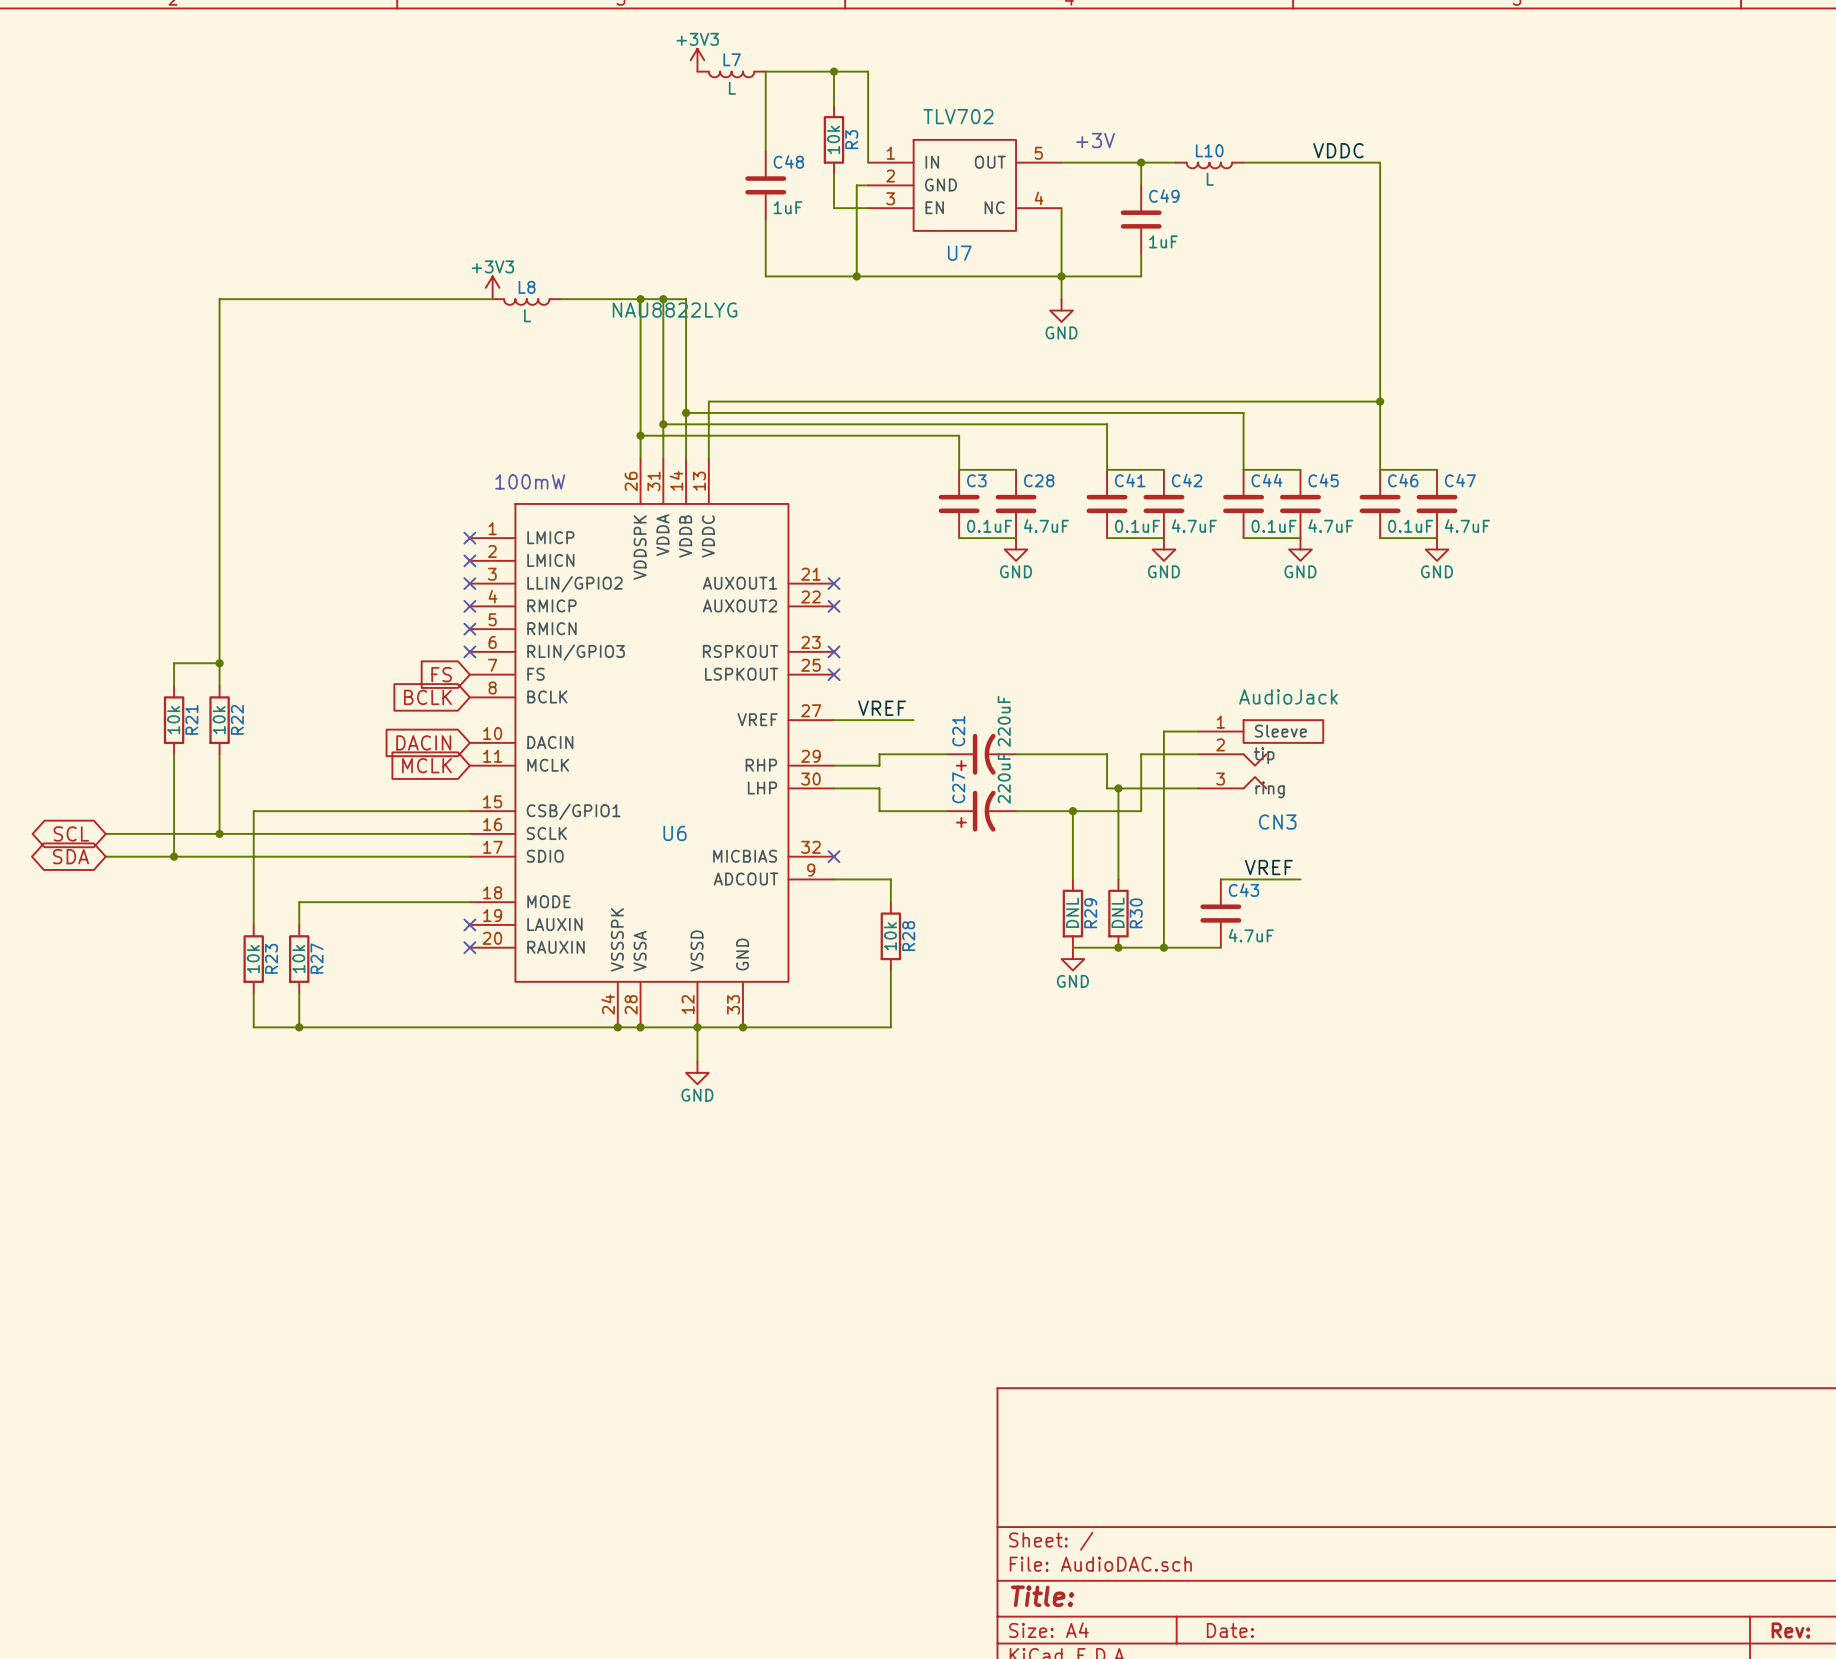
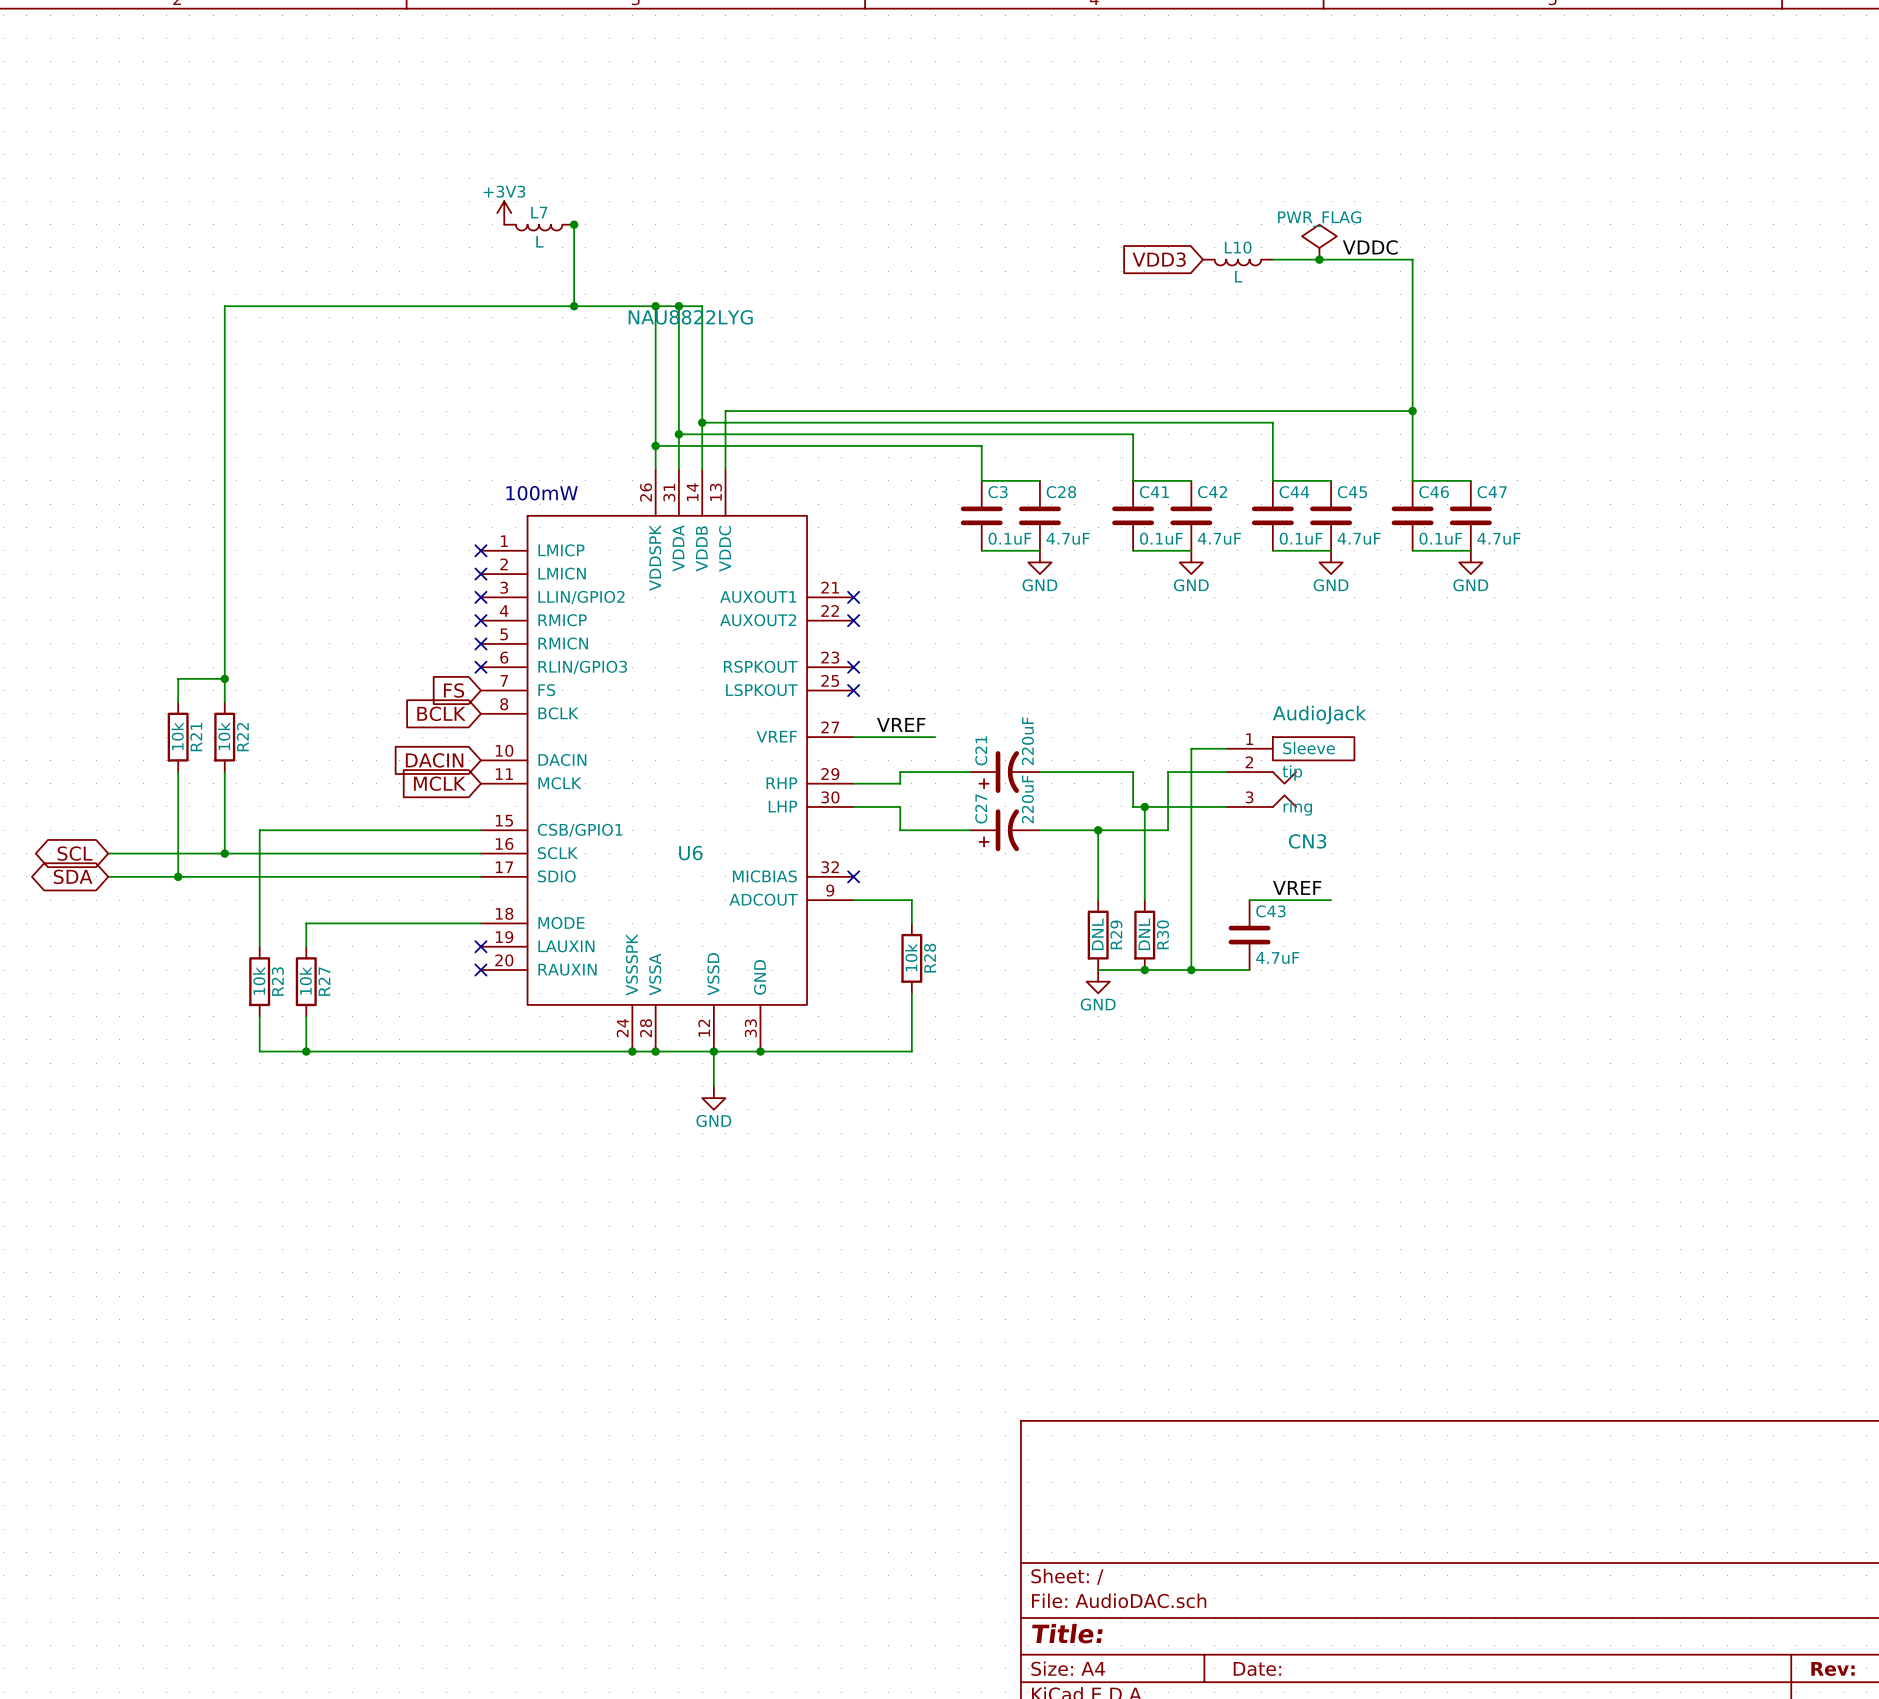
power symbol: +3V3 (697, 60) -> none
wire: (833, 71) (833, 105) -> none
junction: (833, 71) -> none
L7 position: (731, 74) -> (539, 227)
R3: 10k (833, 139) -> none
text: +3V (1095, 140) -> none
label position: VDDC (1338, 150) -> VDDC (1370, 247)
wire: (765, 151) (765, 71) (868, 71) (868, 162) -> none
wire: (1061, 162) (1175, 162) -> none
wire: (1141, 162) (1141, 185) -> none
junction: (1141, 162) -> none
wire: (1243, 162) (1380, 162) (1380, 253) -> (1272, 259) (1412, 259)
L10 position: (1209, 165) -> (1237, 262)
wire: (833, 174) (833, 208) (868, 208) -> none
C48: 1uF (765, 185) -> none
wire: (868, 185) (856, 185) (856, 276) -> none
U7: TLV702 (964, 185) -> none
wire: (1061, 208) (1061, 299) -> none
wire: none -> (574, 224) (574, 306) (504, 306)
junction: none -> (574, 224)
wire: (765, 219) (765, 276) (1141, 276) (1141, 253) -> none
C49: 1uF (1141, 219) -> none
power symbol: none -> PWR_FLAG (1319, 242)
global label: none -> VDD3 (1159, 259)
junction: none -> (1319, 259)
junction: (856, 276) -> none
junction: (1061, 276) -> none
power symbol position: +3V3 (492, 287) -> +3V3 (504, 213)
junction: none -> (574, 306)
L8: L (526, 302) -> none
power symbol: GND (1061, 310) -> none

